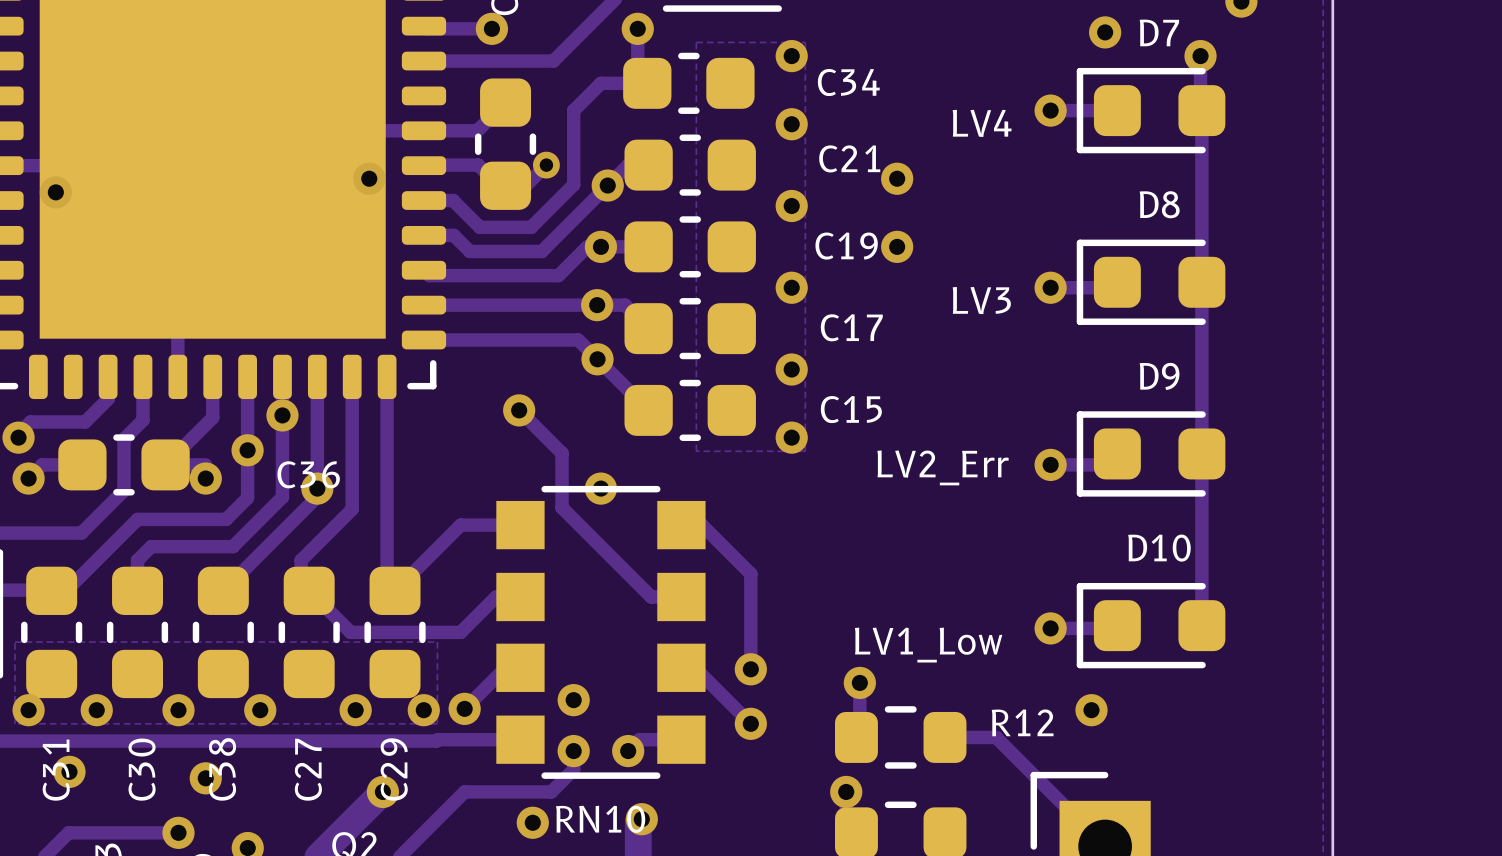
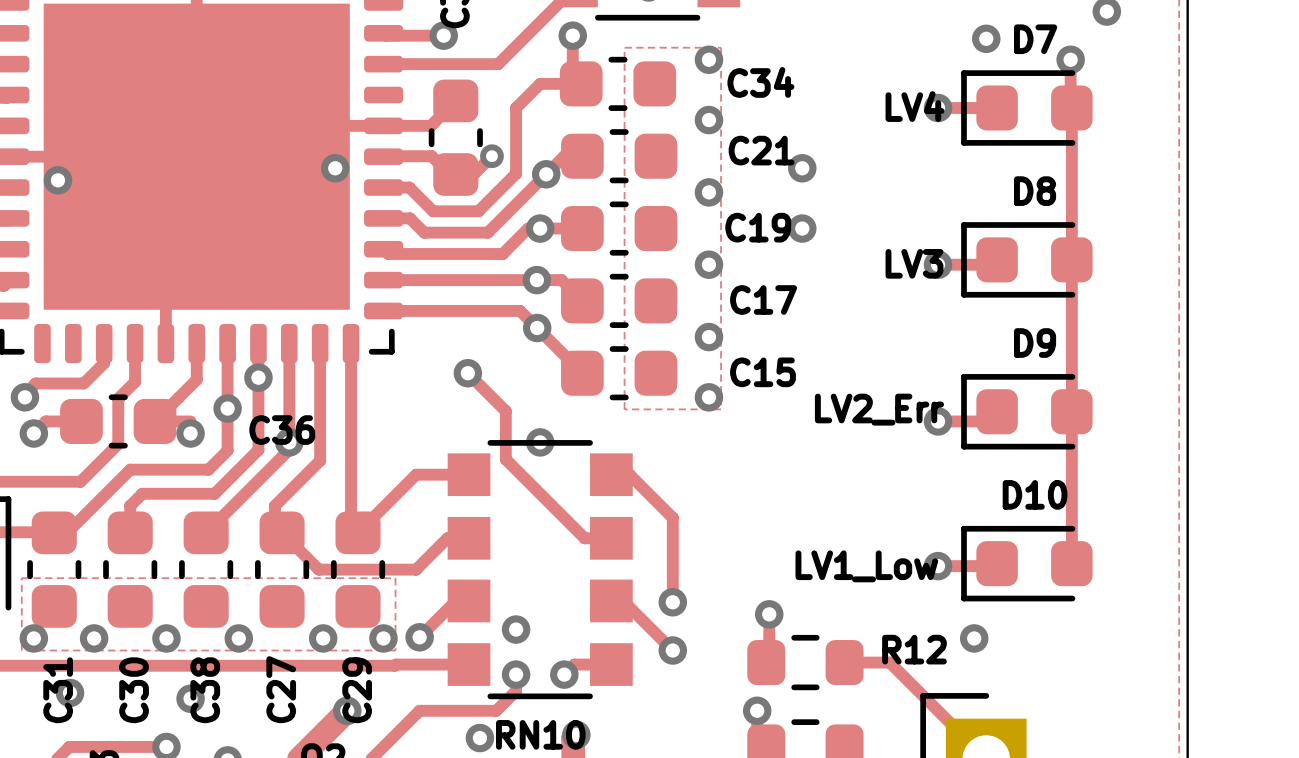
D7 value position: LV4 (982, 123) -> LV4 (915, 106)
D8 value position: LV3 (981, 300) -> LV3 (914, 263)
D9 value position: LV2_Err (943, 467) -> LV2_Err (879, 409)
D10 value position: LV1_Low (928, 645) -> LV1_Low (866, 566)

